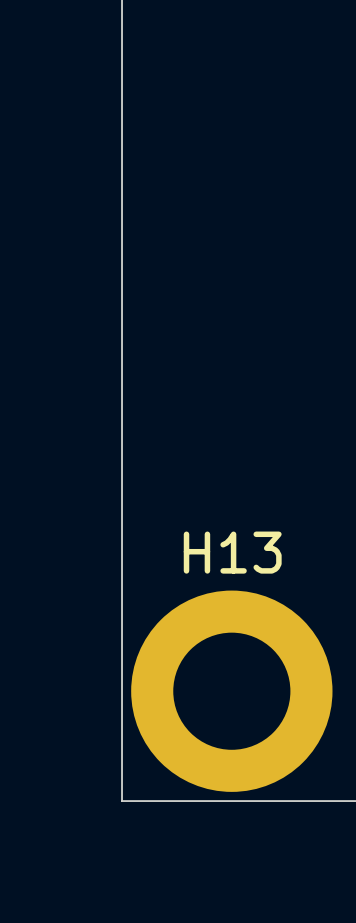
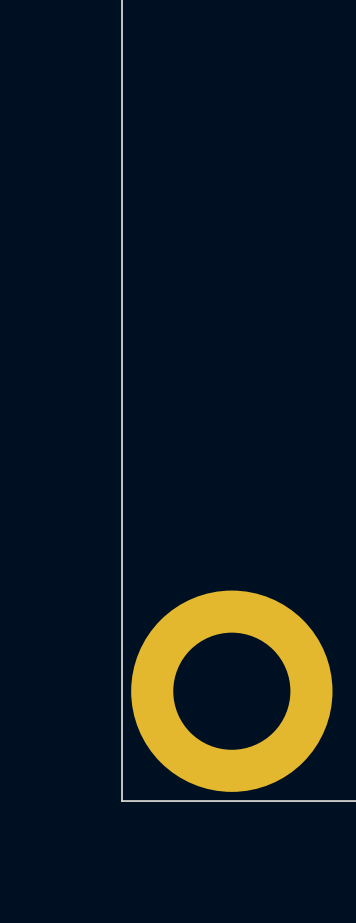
H13 name: H13 (232, 552) -> none

